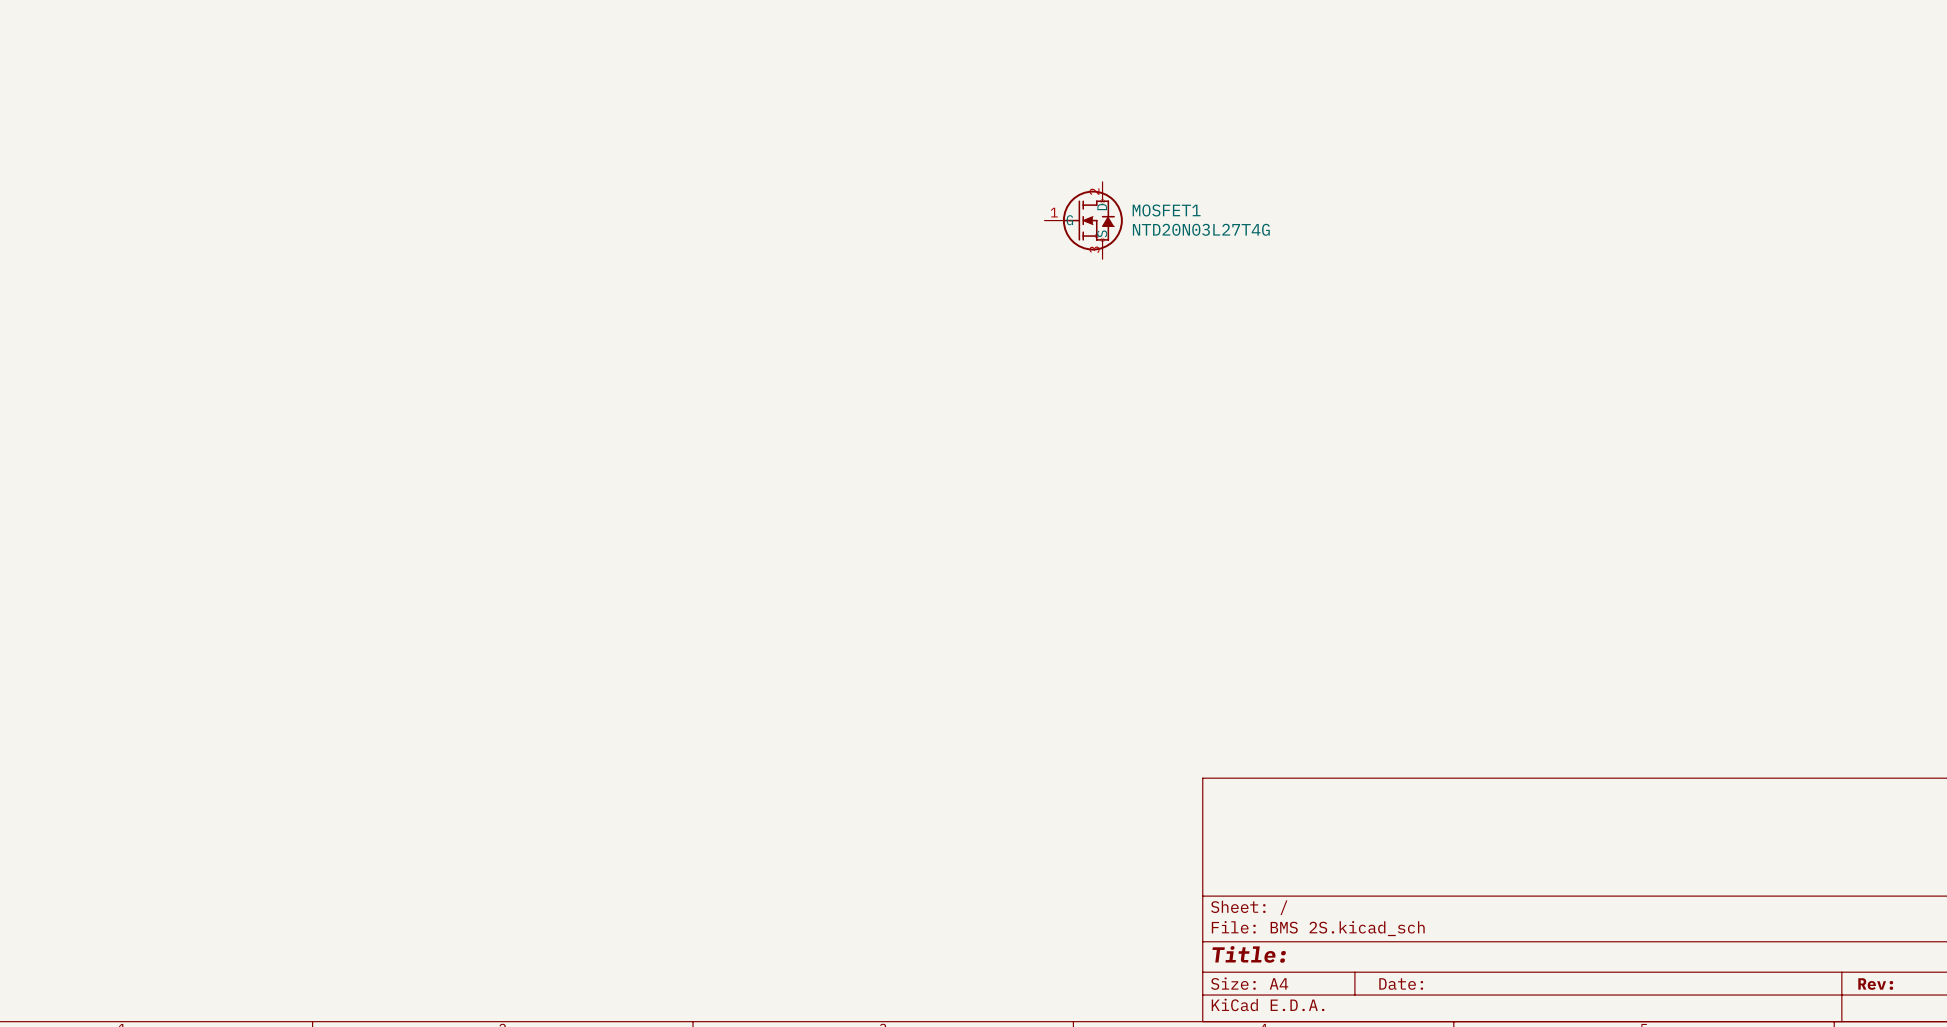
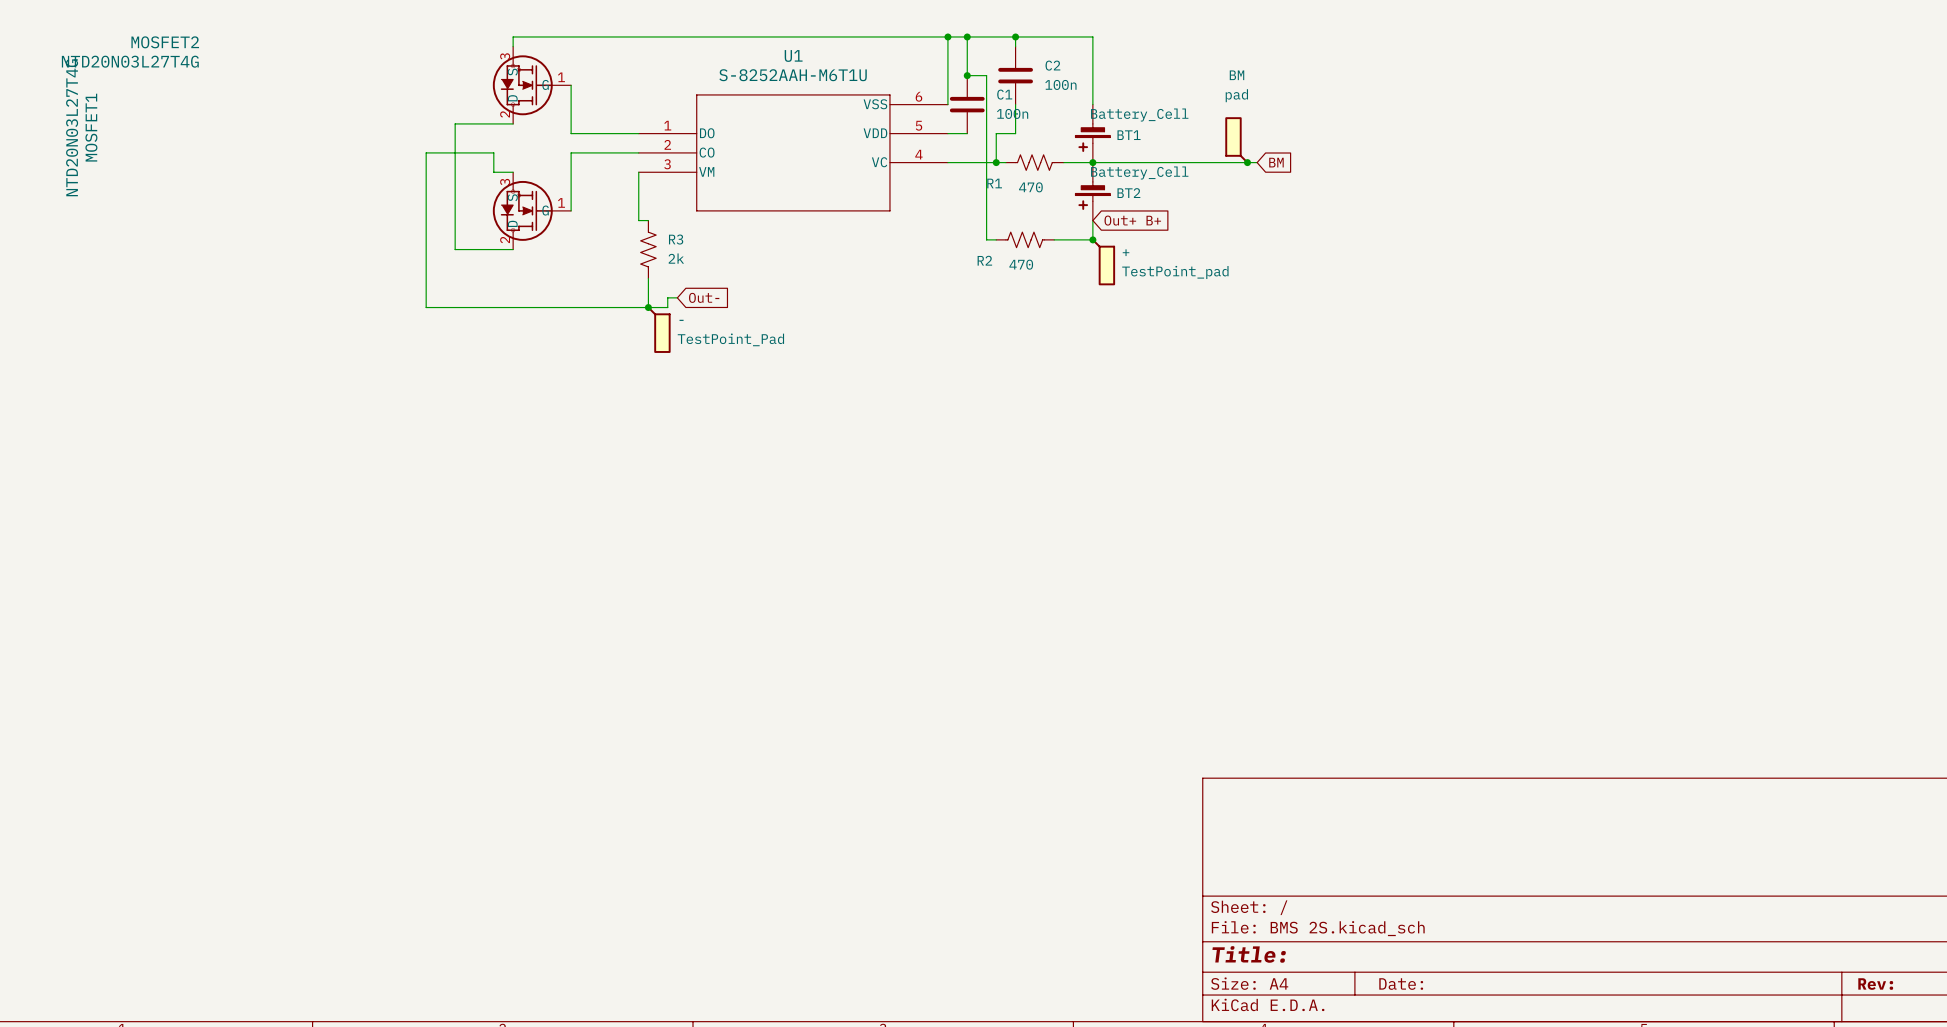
wire: none -> (947, 36) (947, 104)
junction: none -> (947, 36)
wire: none -> (967, 36) (967, 75) (986, 75) (986, 239) (996, 239)
junction: none -> (967, 36)
wire: none -> (1015, 36) (1015, 46)
junction: none -> (1015, 36)
wire: none -> (513, 46) (513, 36) (1092, 36) (1092, 104)
junction: none -> (967, 75)
C2: none -> 100n (1015, 75)
MOSFET2: none -> NTD20N03L27T4G (531, 85)
wire: none -> (571, 85) (571, 133) (638, 133)
C1: none -> 100n (967, 104)
wire: none -> (1015, 104) (1015, 133) (996, 133) (996, 162)
wire: none -> (513, 123) (455, 123) (455, 249) (513, 249)
wire: none -> (947, 133) (967, 133)
BT1: none -> Battery_Cell (1092, 133)
BM: none -> pad (1236, 140)
wire: none -> (638, 152) (571, 152) (571, 210)
U1: none -> S-8252AAH-M6T1U (793, 152)
wire: none -> (947, 162) (1005, 162)
junction: none -> (996, 162)
R1: none -> 470 (1034, 162)
wire: none -> (1063, 162) (1257, 162)
junction: none -> (1092, 162)
junction: none -> (1247, 162)
global label: none -> BM (1276, 162)
wire: none -> (513, 172) (493, 172) (493, 152) (426, 152) (426, 307) (667, 307) (667, 297) (677, 297)
wire: none -> (638, 172) (638, 220) (648, 220)
BT2: none -> Battery_Cell (1092, 191)
MOSFET1 name position: MOSFET1 (1166, 210) -> MOSFET1 (91, 127)
MOSFET1 position: (1083, 220) -> (531, 210)
wire: none -> (1092, 220) (1092, 239) (1054, 239)
MOSFET1 rotation: 0° (1092, 220) -> 180° (522, 210)
global label: none -> Out+ B+ (1132, 220)
MOSFET1 value position: NTD20N03L27T4G (1201, 229) -> NTD20N03L27T4G (72, 127)
R2: none -> 470 (1025, 239)
junction: none -> (1092, 239)
R3: none -> 2k (648, 249)
part: none -> TestPoint_pad (1103, 262)
wire: none -> (648, 278) (648, 307)
global label: none -> Out- (704, 297)
junction: none -> (648, 307)
part: none -> TestPoint_Pad (659, 329)

